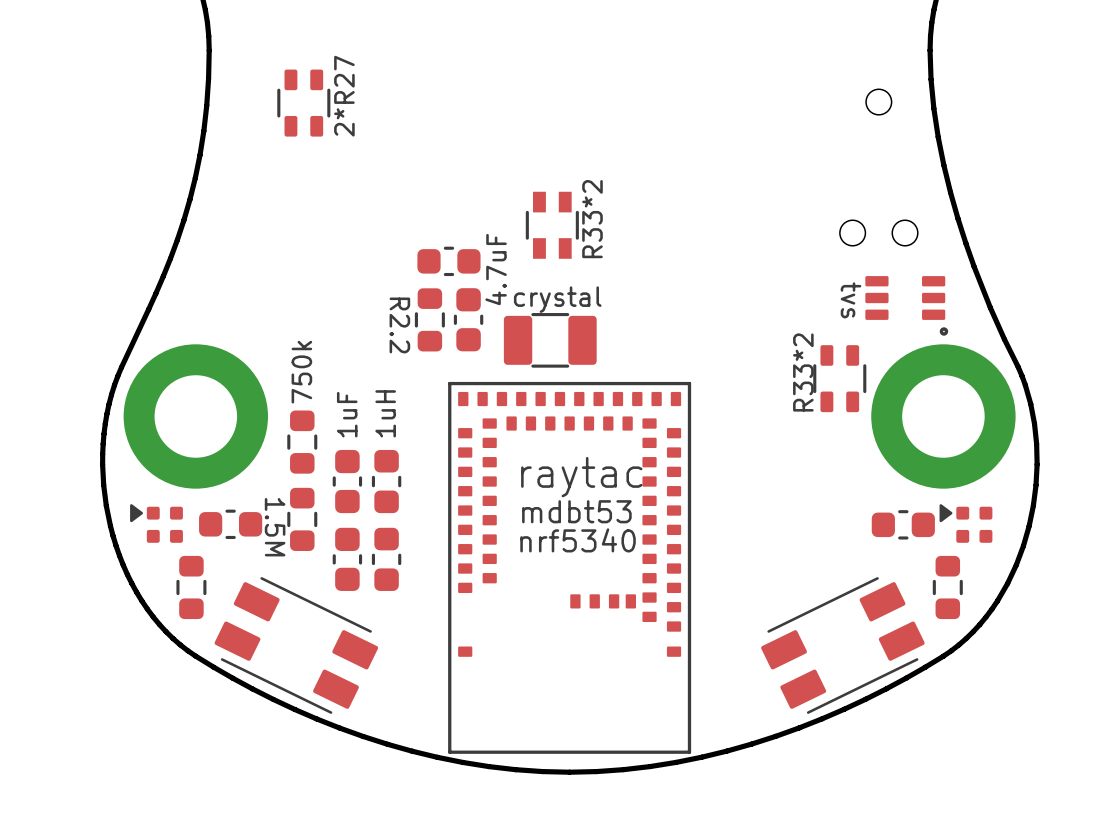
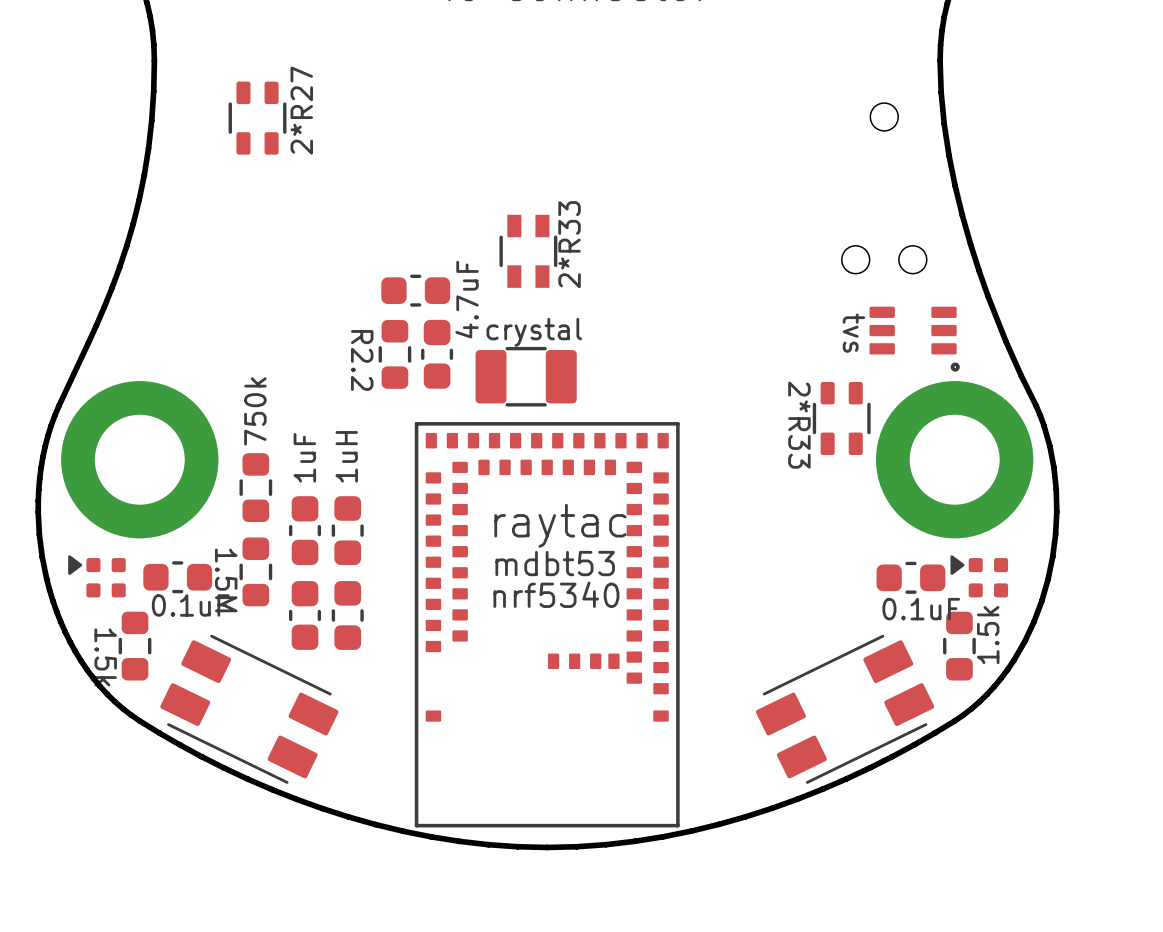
text: R33*2 (592, 219) -> 2*R33 (569, 244)
text: R33*2 (803, 372) -> none
text: none -> 2*R33 (799, 425)
text: none -> 0.1uF (190, 605)
text: none -> 0.1uF (921, 609)
text: none -> 1.5k (988, 635)
text: none -> 1.5k (105, 657)

